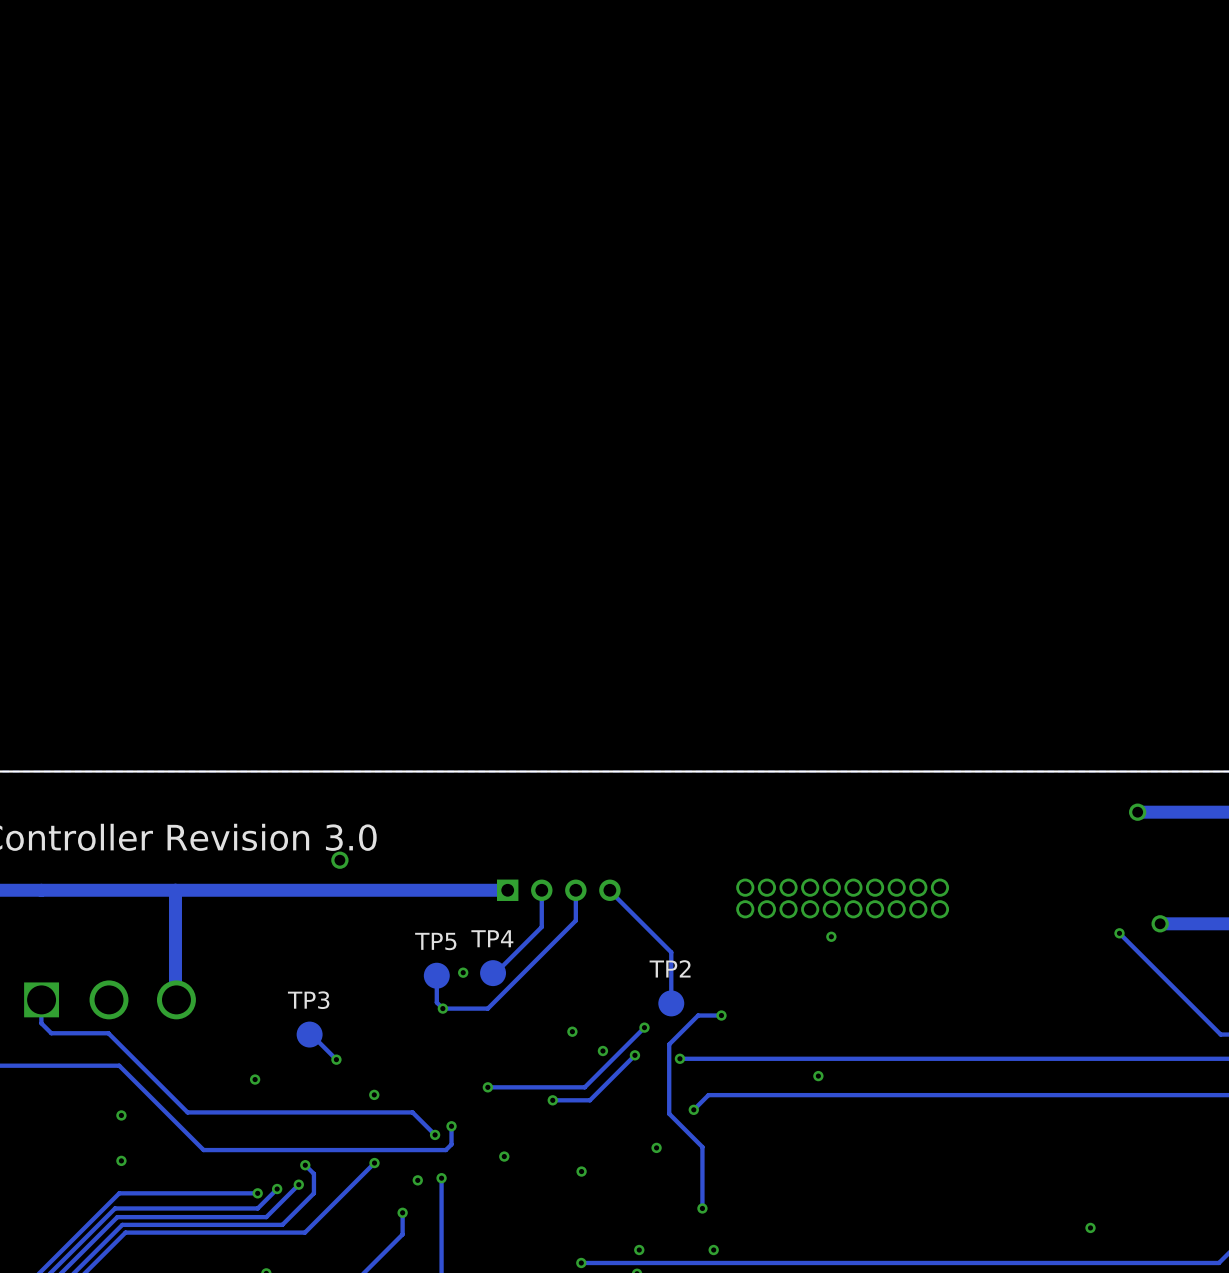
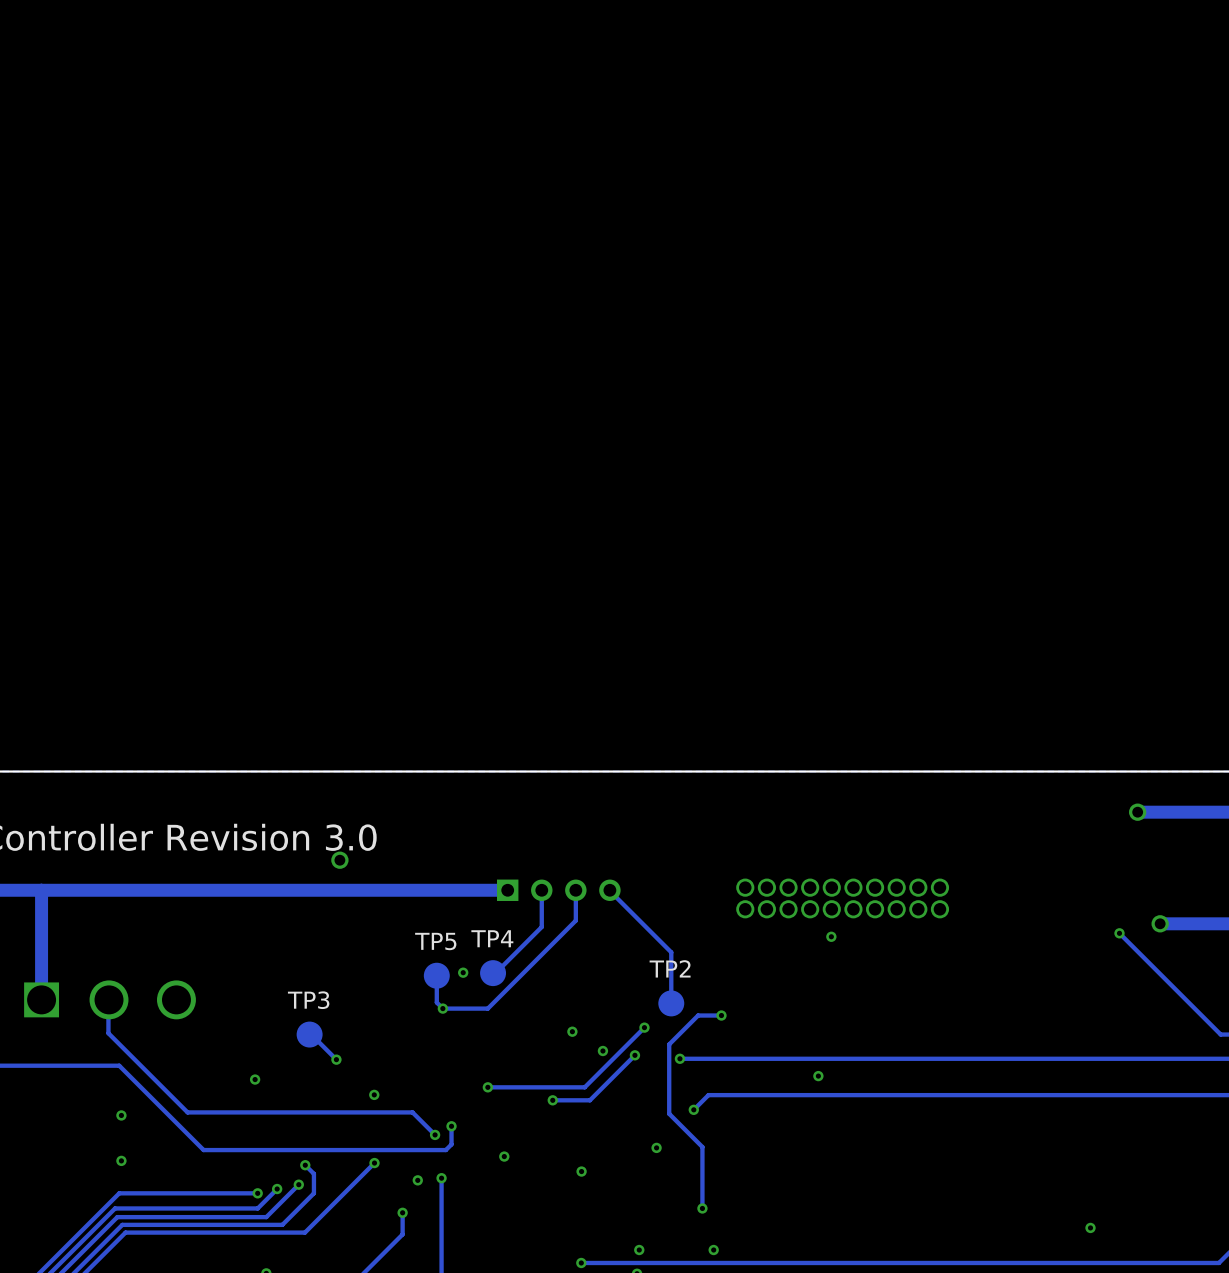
track: none -> (41, 890) (41, 999)
track: (175, 890) (175, 1003) -> none
track: (41, 1002) (41, 1023) (51, 1033) (108, 1033) -> (108, 1002) (108, 1033)

